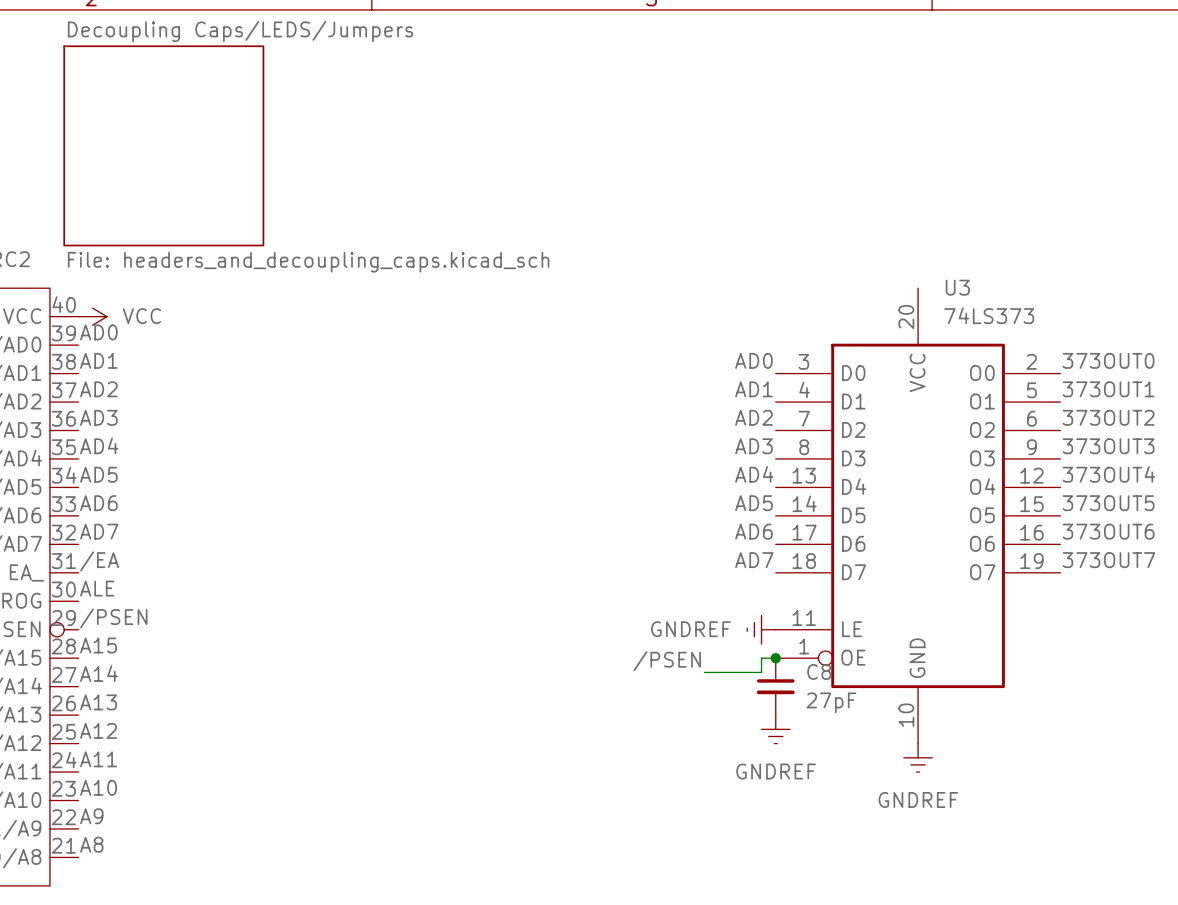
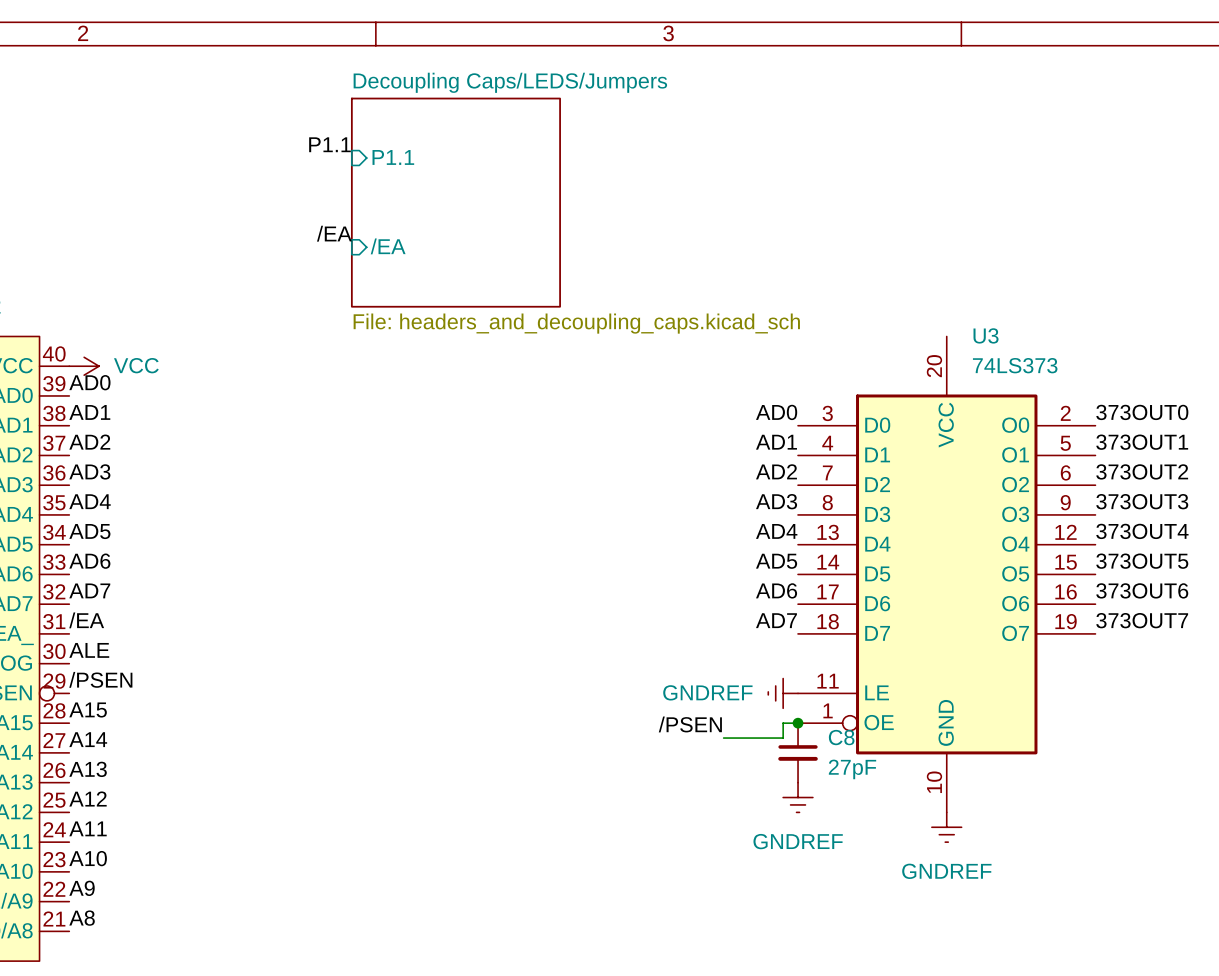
label: none -> P1.1 (329, 144)
sheet pin: none -> P1.1 (393, 157)
sheet Decoupling Caps/LEDS/Jumpers: File: headers_and_decoupling_caps.kicad_sch (163, 145) -> none
sheet Decoupling Caps/LEDS/Jumpers: none -> File: headers_and_decoupling_caps.kicad_sch (455, 202)
label: none -> /EA (334, 233)
sheet pin: none -> /EA (388, 246)

